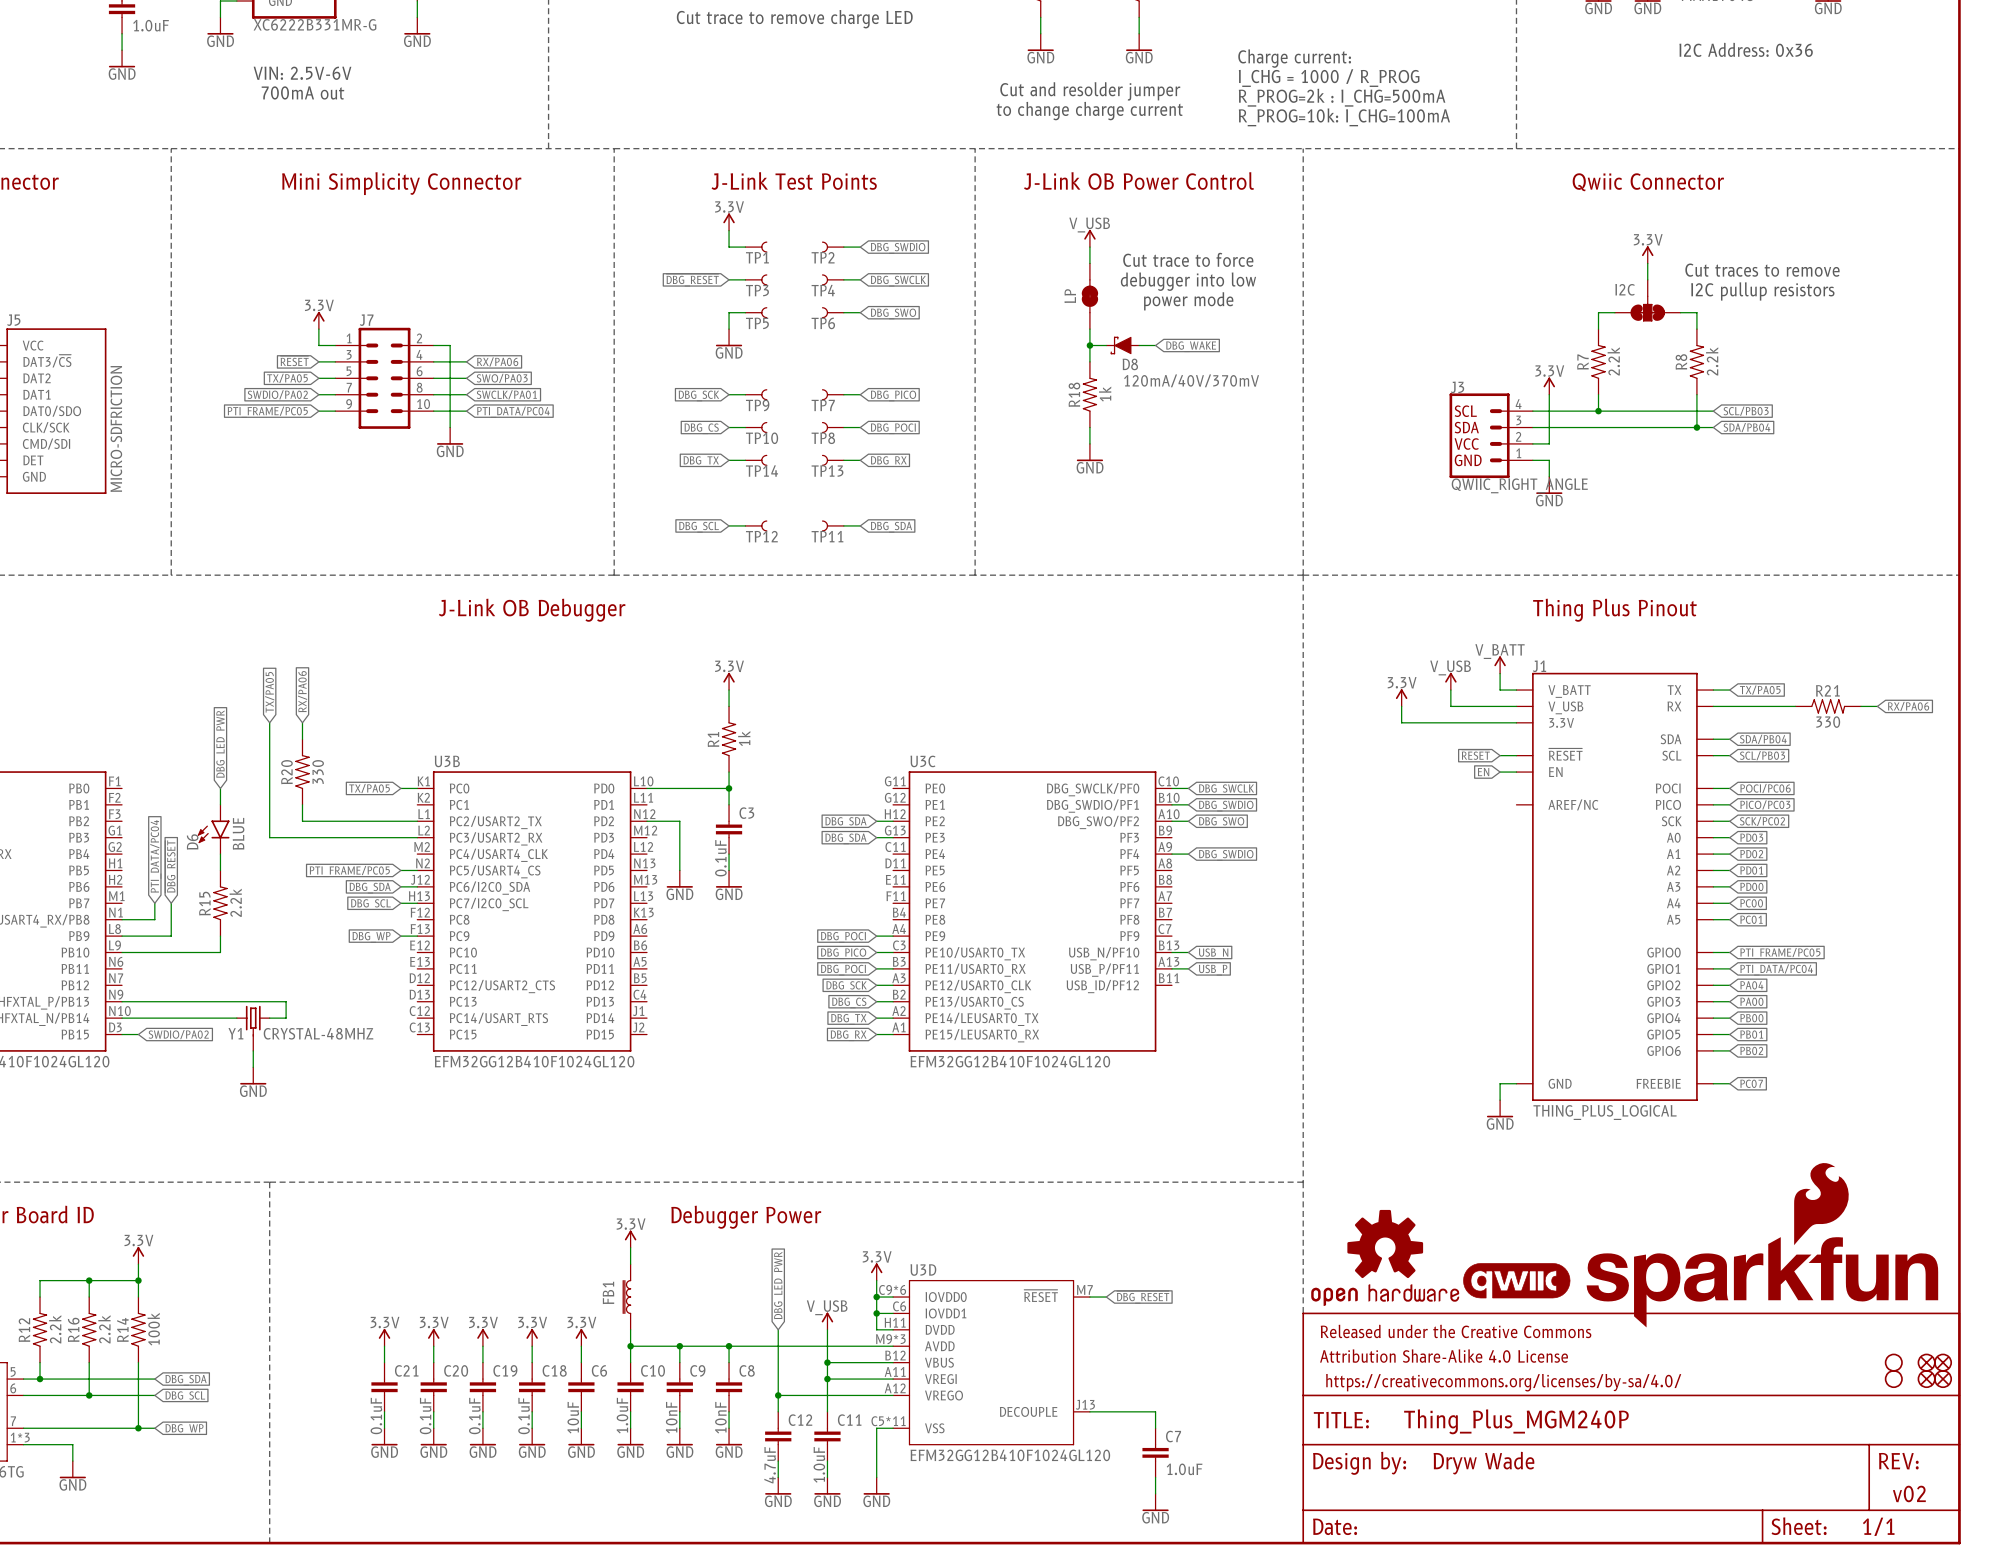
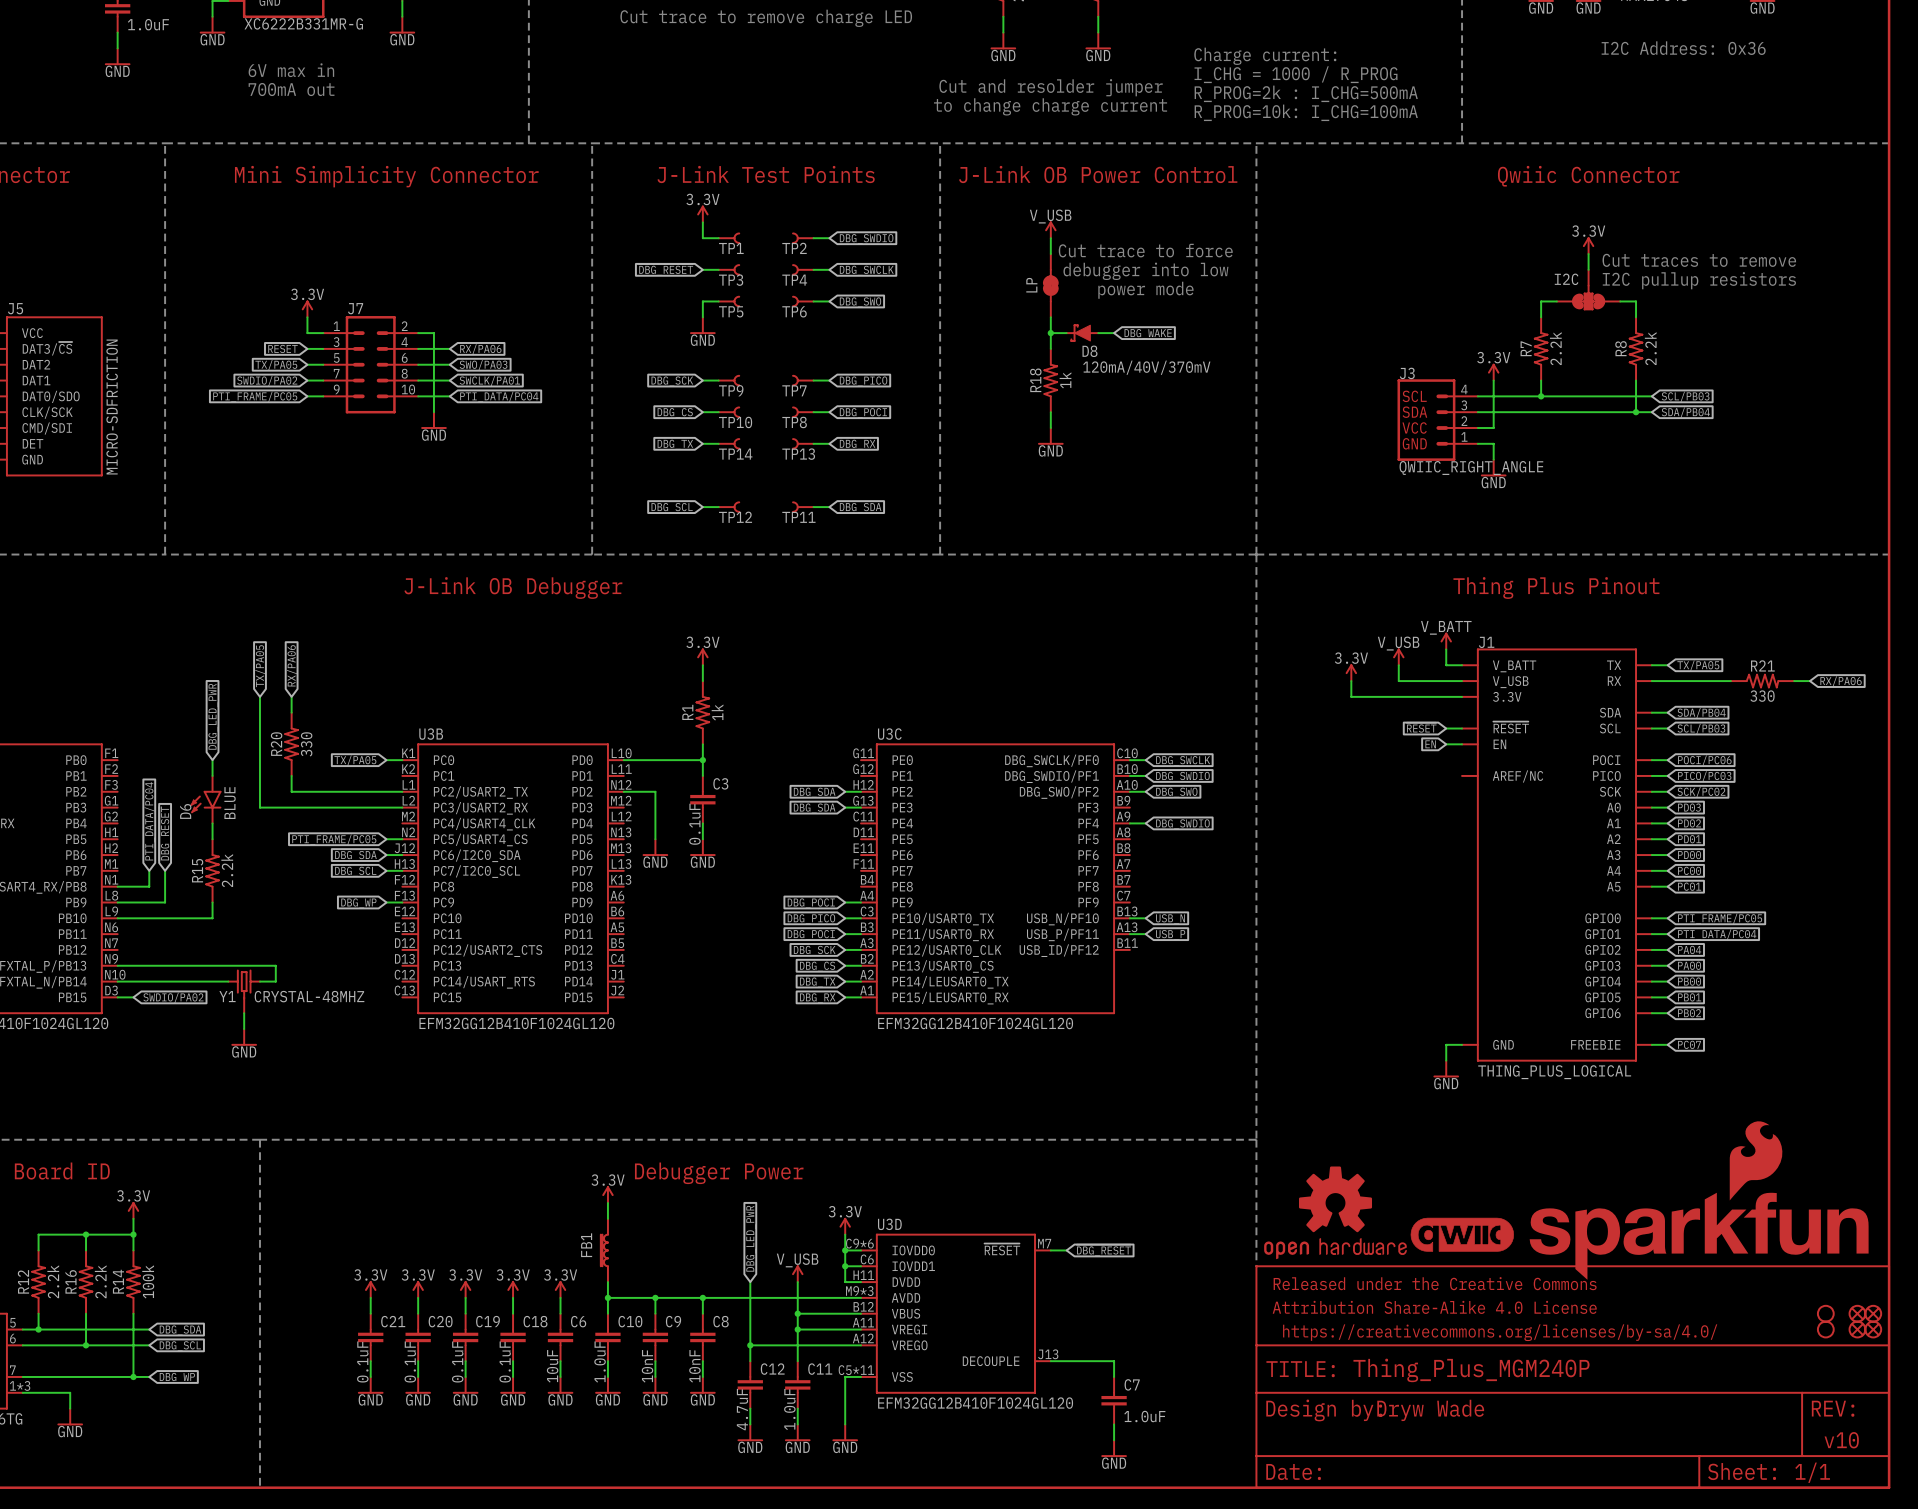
text: VIN: 2.5V-6V (302, 73) -> 6V max in (291, 70)
text: v02 (1909, 1494) -> v10 (1841, 1440)

